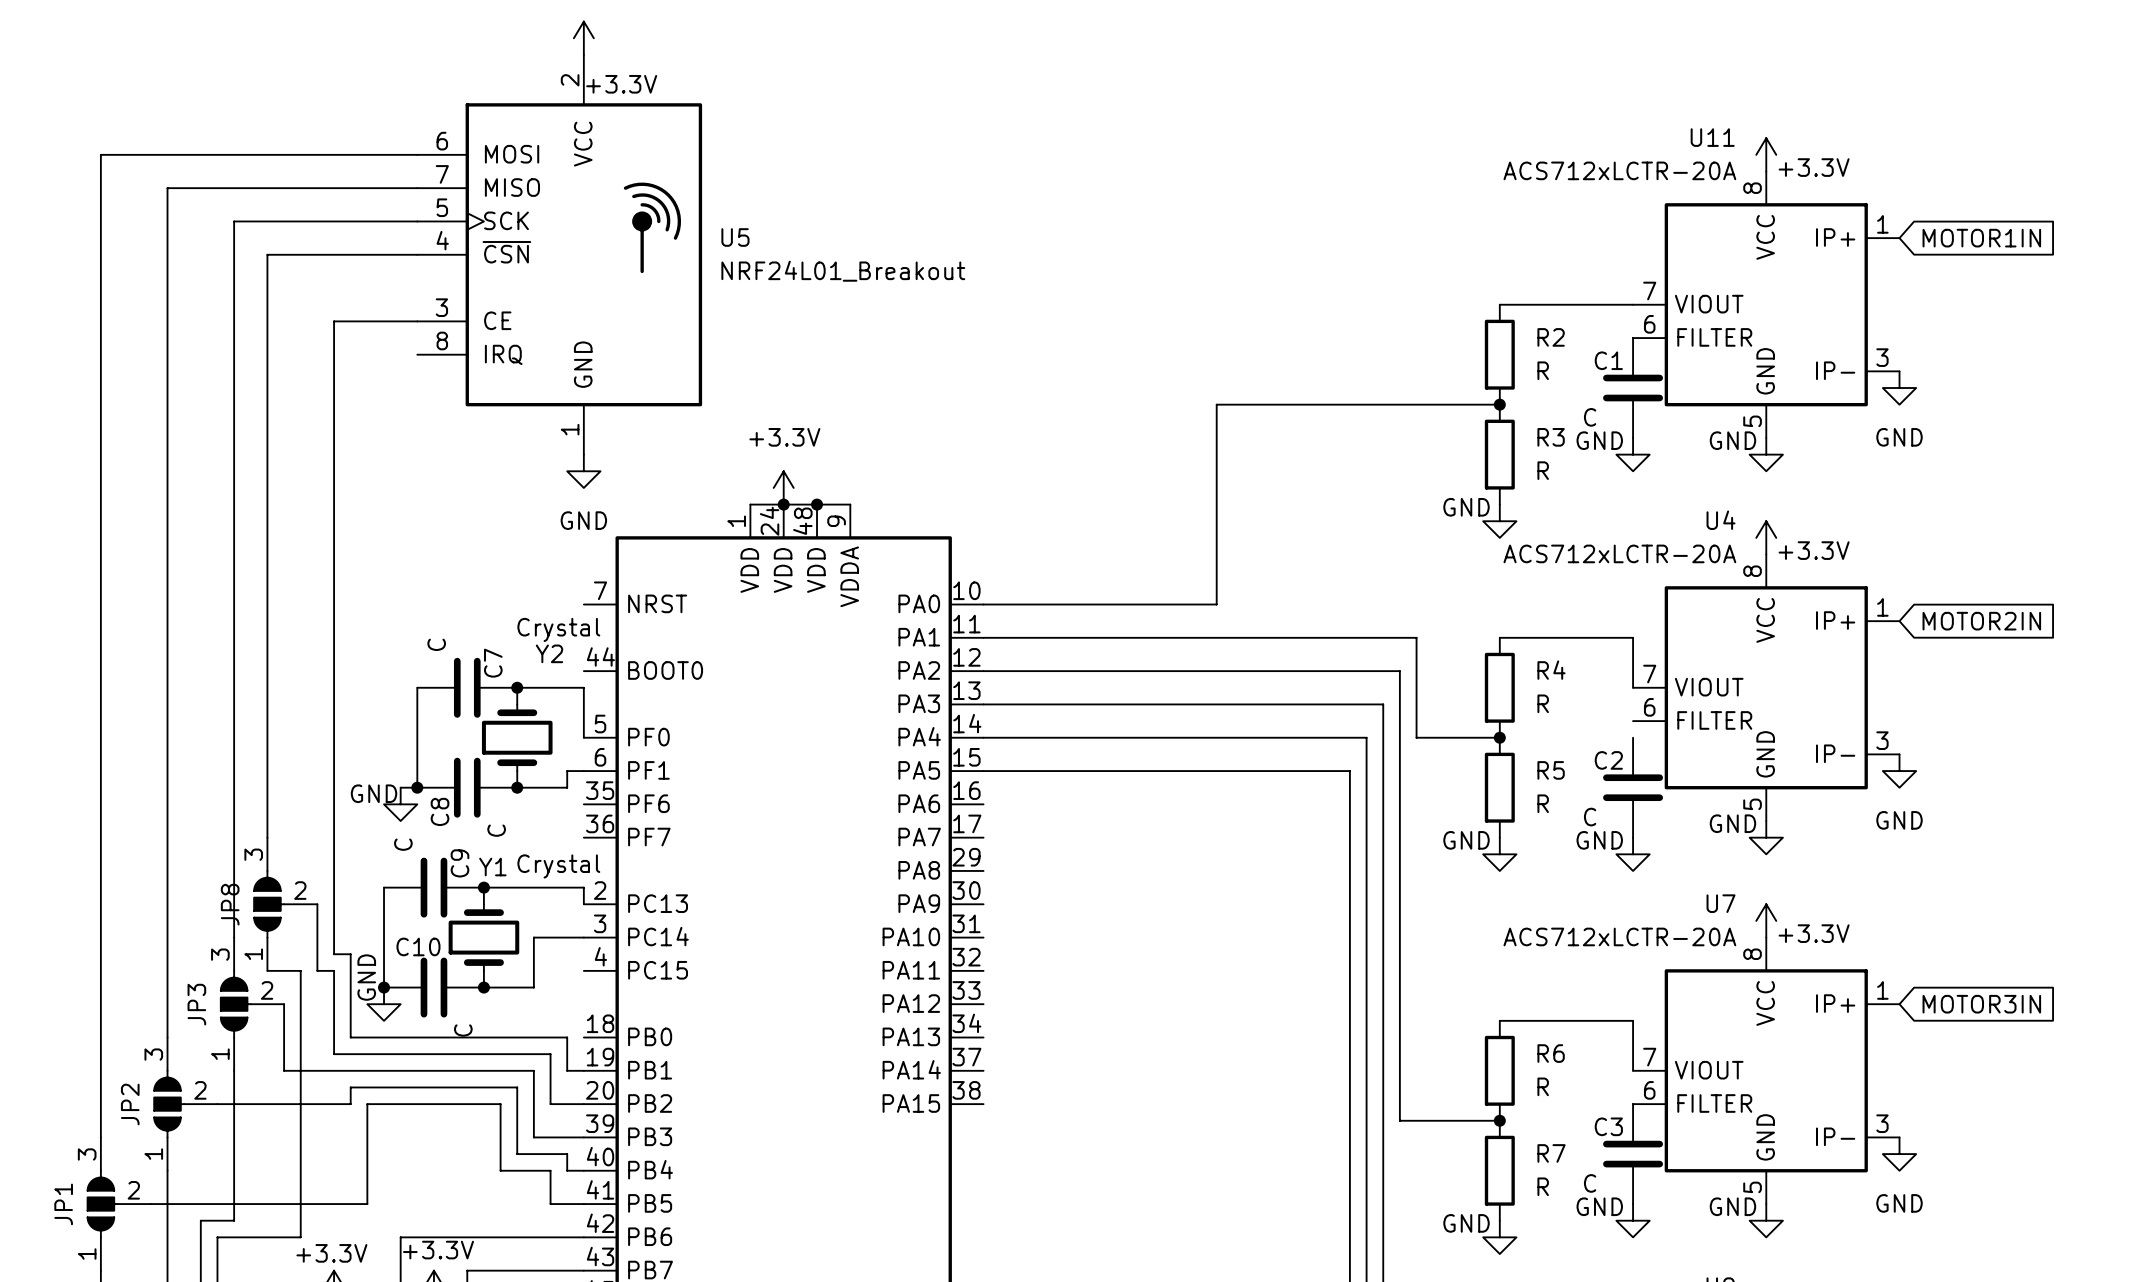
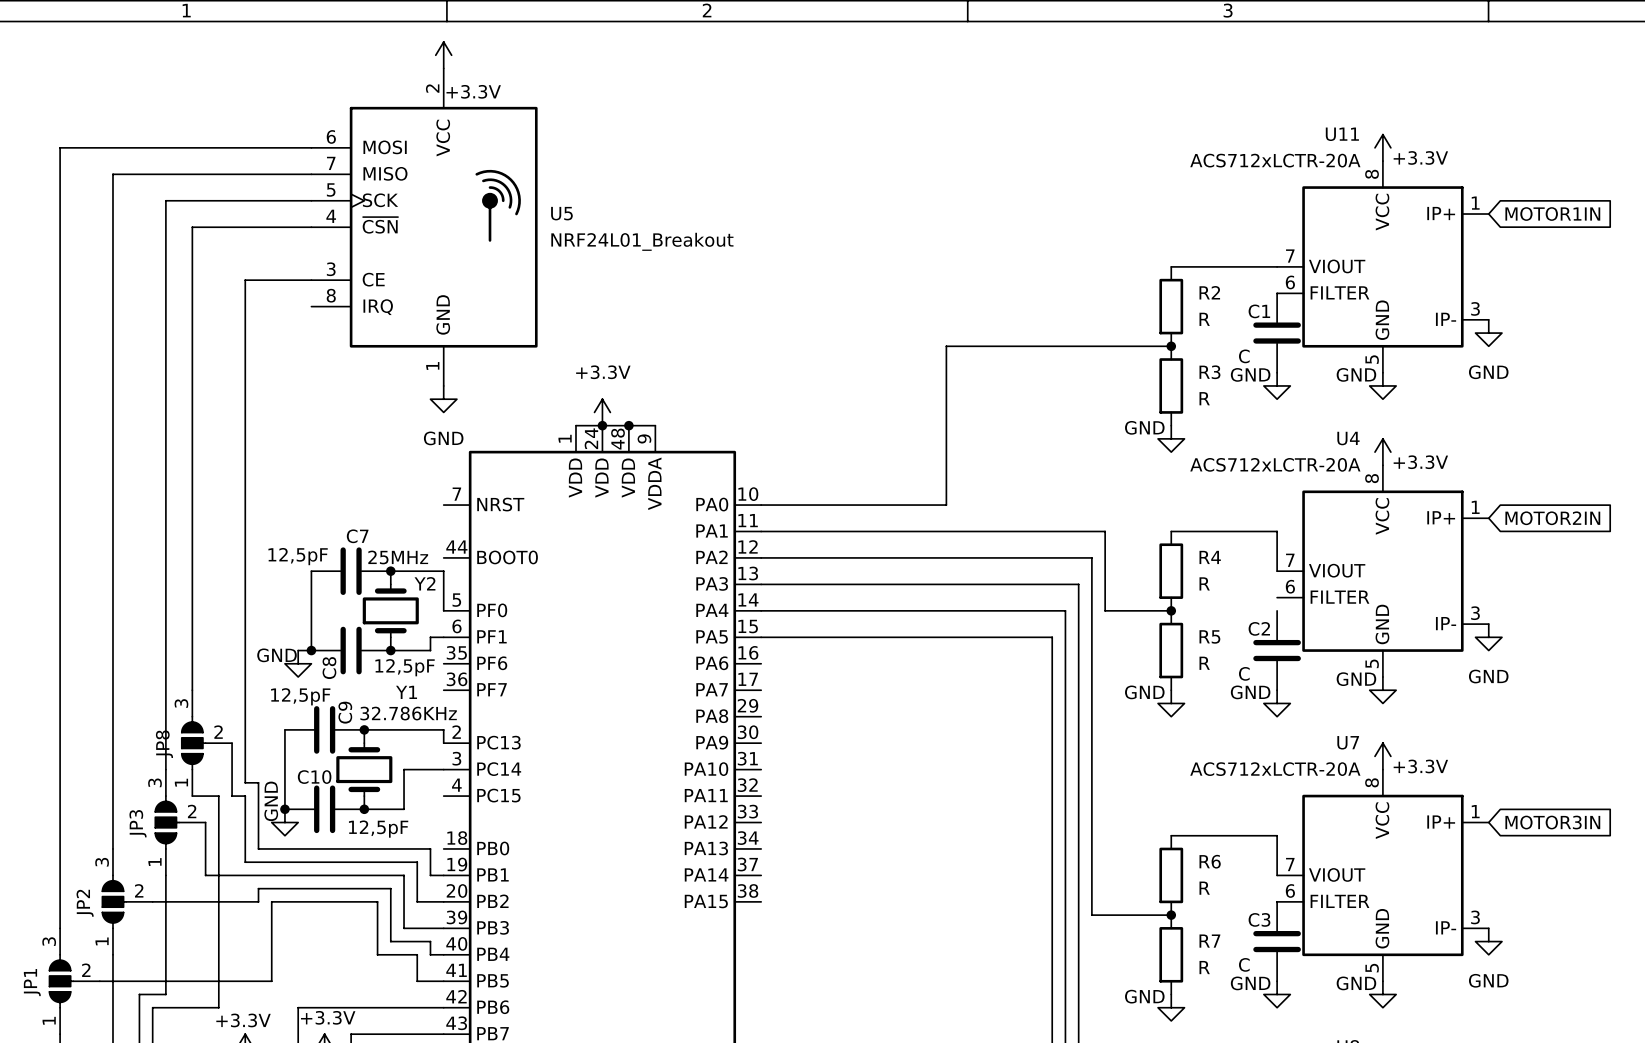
Y2 value: Crystal (558, 629) -> 25MHz (398, 557)
C7 value: C (436, 644) -> 12,5pF (298, 556)
Y2 name position: Y2 (549, 653) -> Y2 (424, 583)
C7 name rotation: 0° (493, 663) -> 90° clockwise (357, 536)
C8 value: C (496, 830) -> 12,5pF (405, 667)
C9 value: C (403, 844) -> 12,5pF (300, 696)
Y1 value: Crystal (558, 866) -> 32.786KHz (408, 713)
Y1 name position: Y1 (492, 867) -> Y1 (406, 692)
C10 value: C (463, 1030) -> 12,5pF (378, 829)

